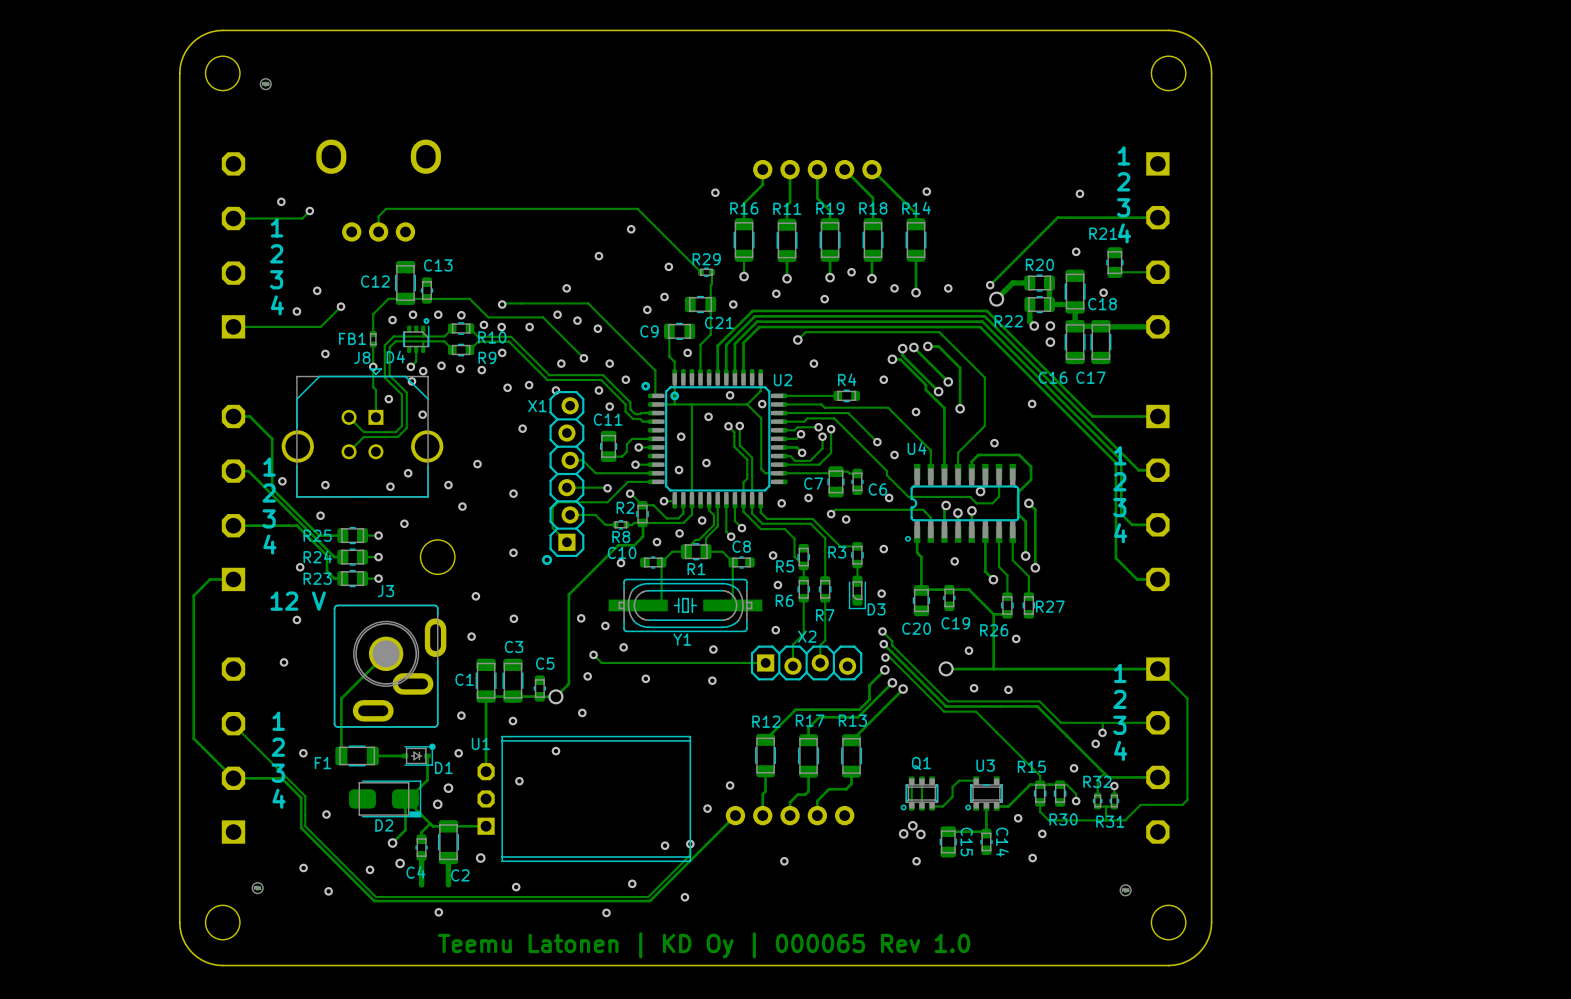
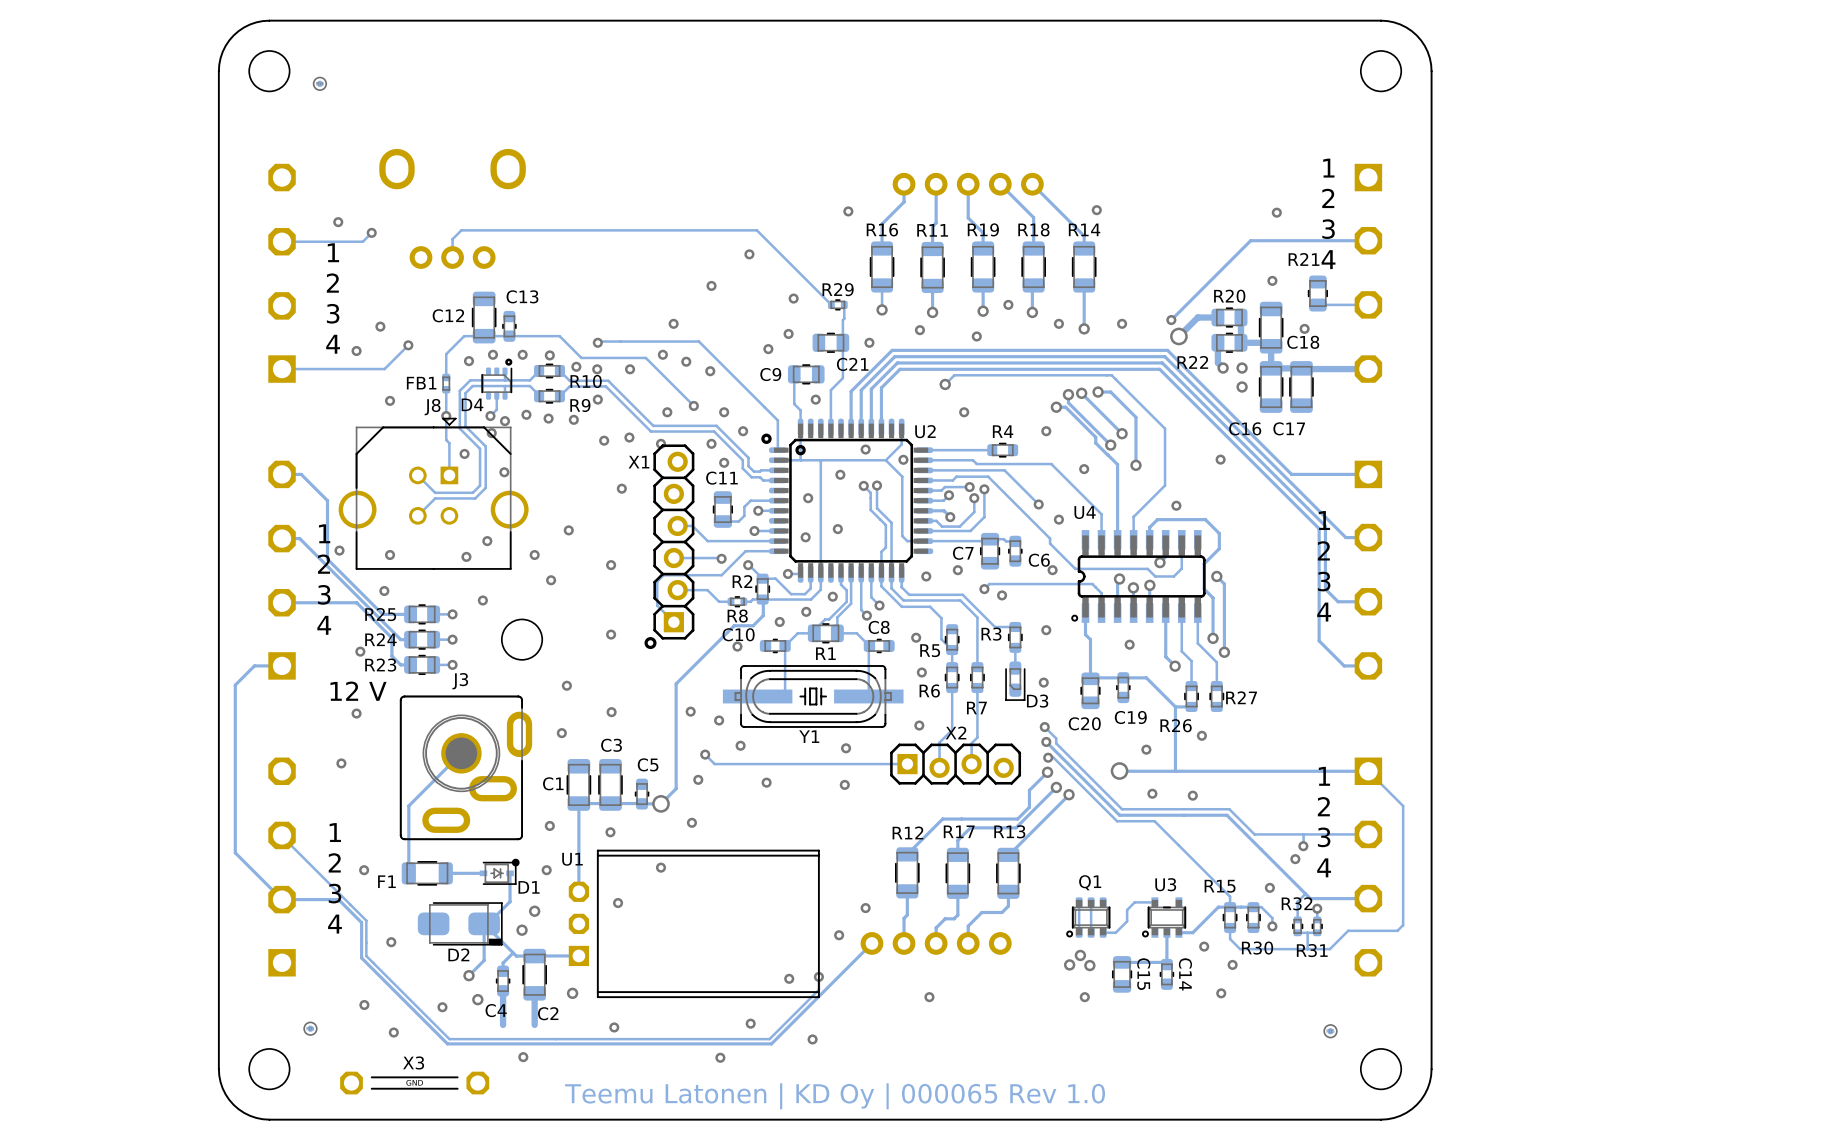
X3: none -> (414, 1083)

